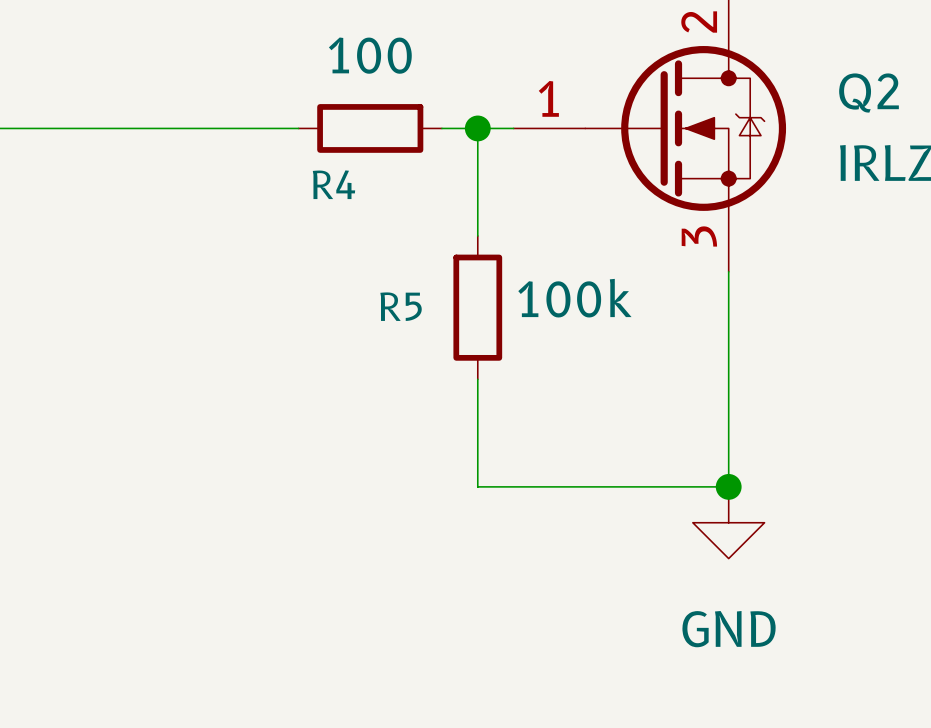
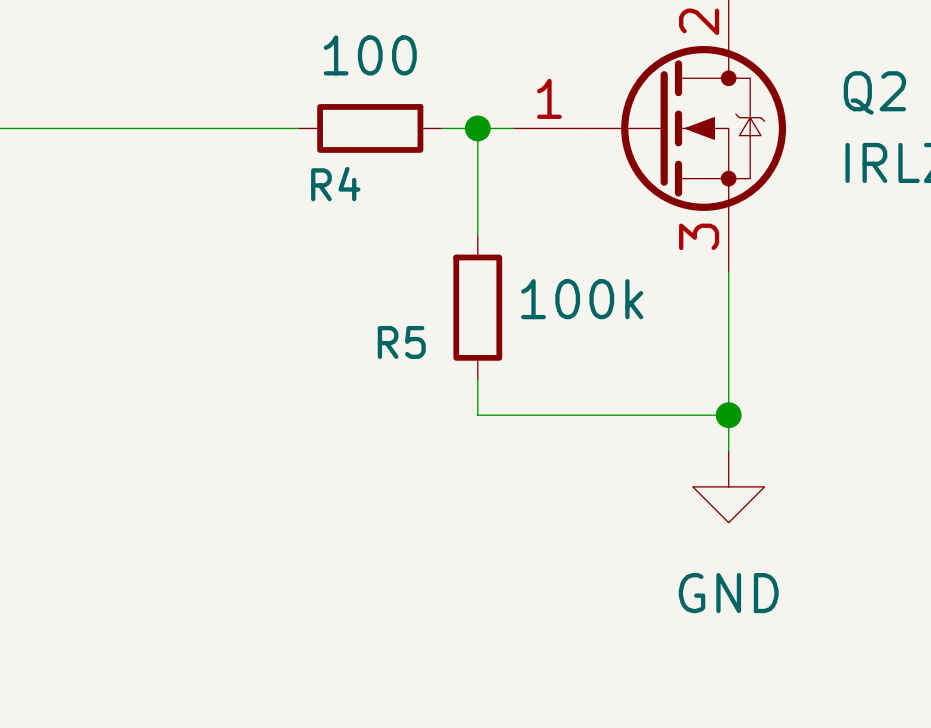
R5 name position: R5 (401, 306) -> R5 (401, 342)
wire: (477, 415) (477, 486) (728, 486) (728, 451) -> (477, 415) (728, 415)
junction position: (728, 486) -> (728, 415)
power symbol position: GND (728, 522) -> GND (728, 486)

